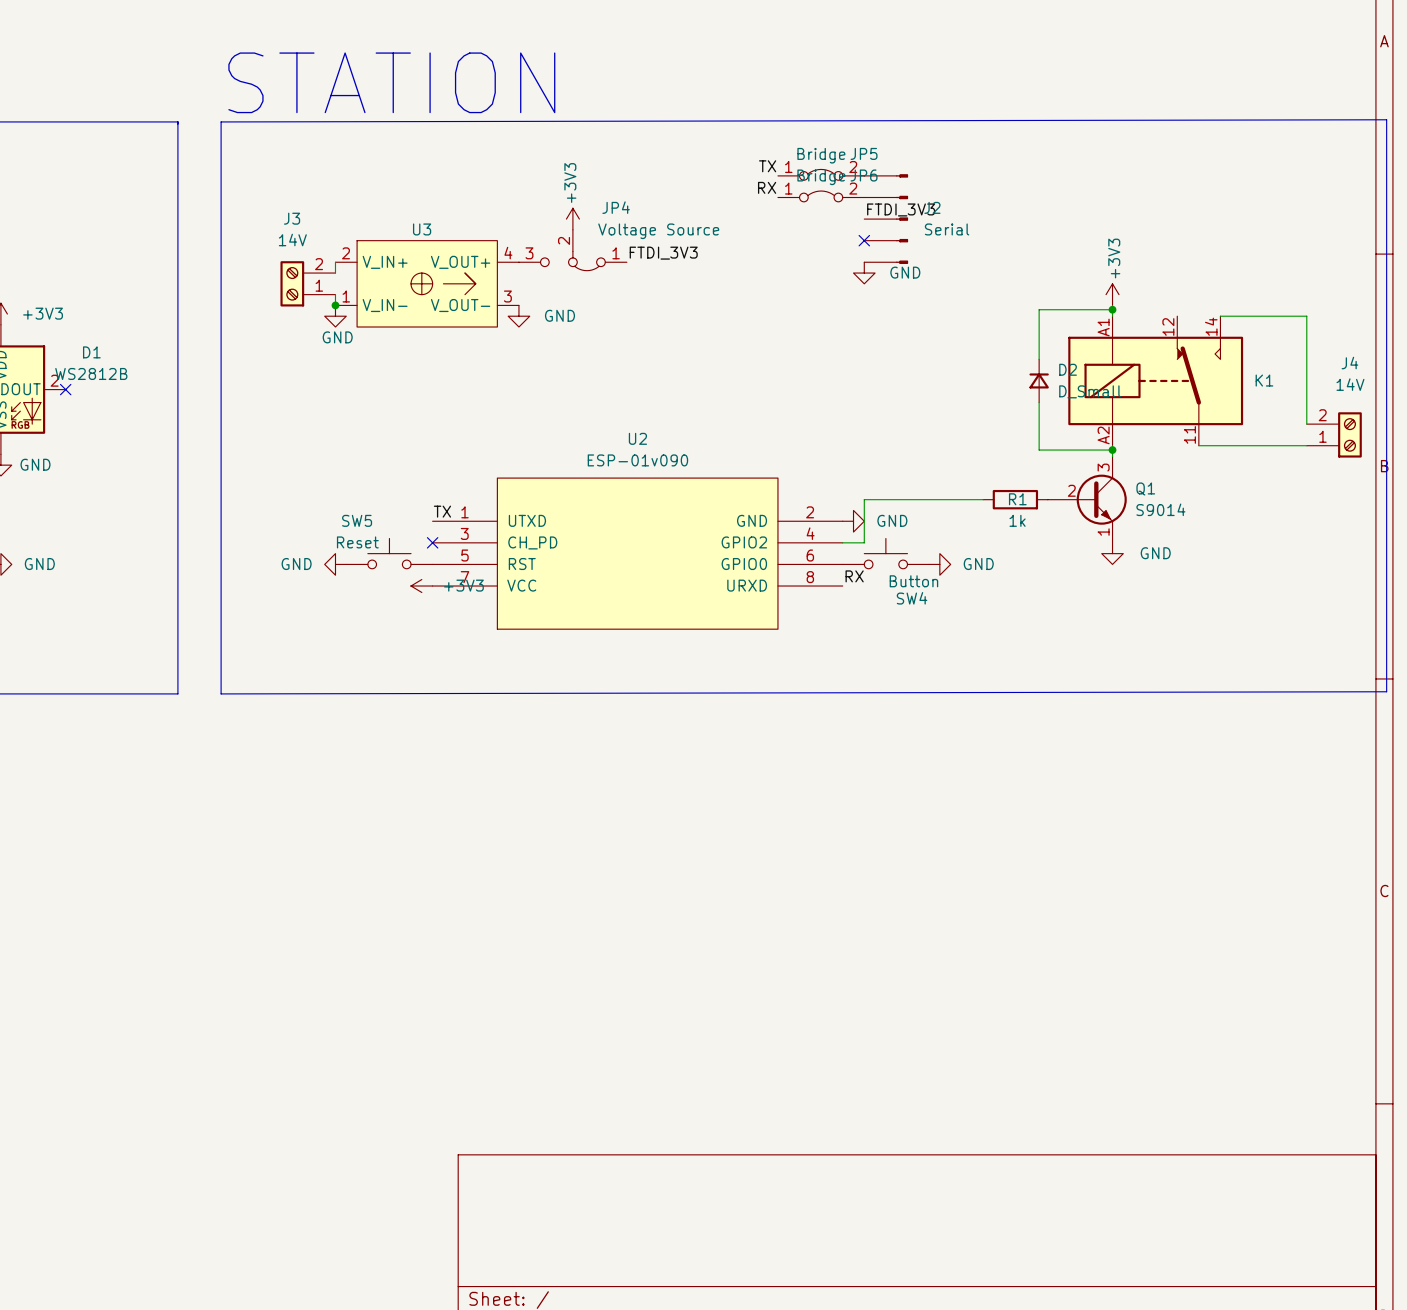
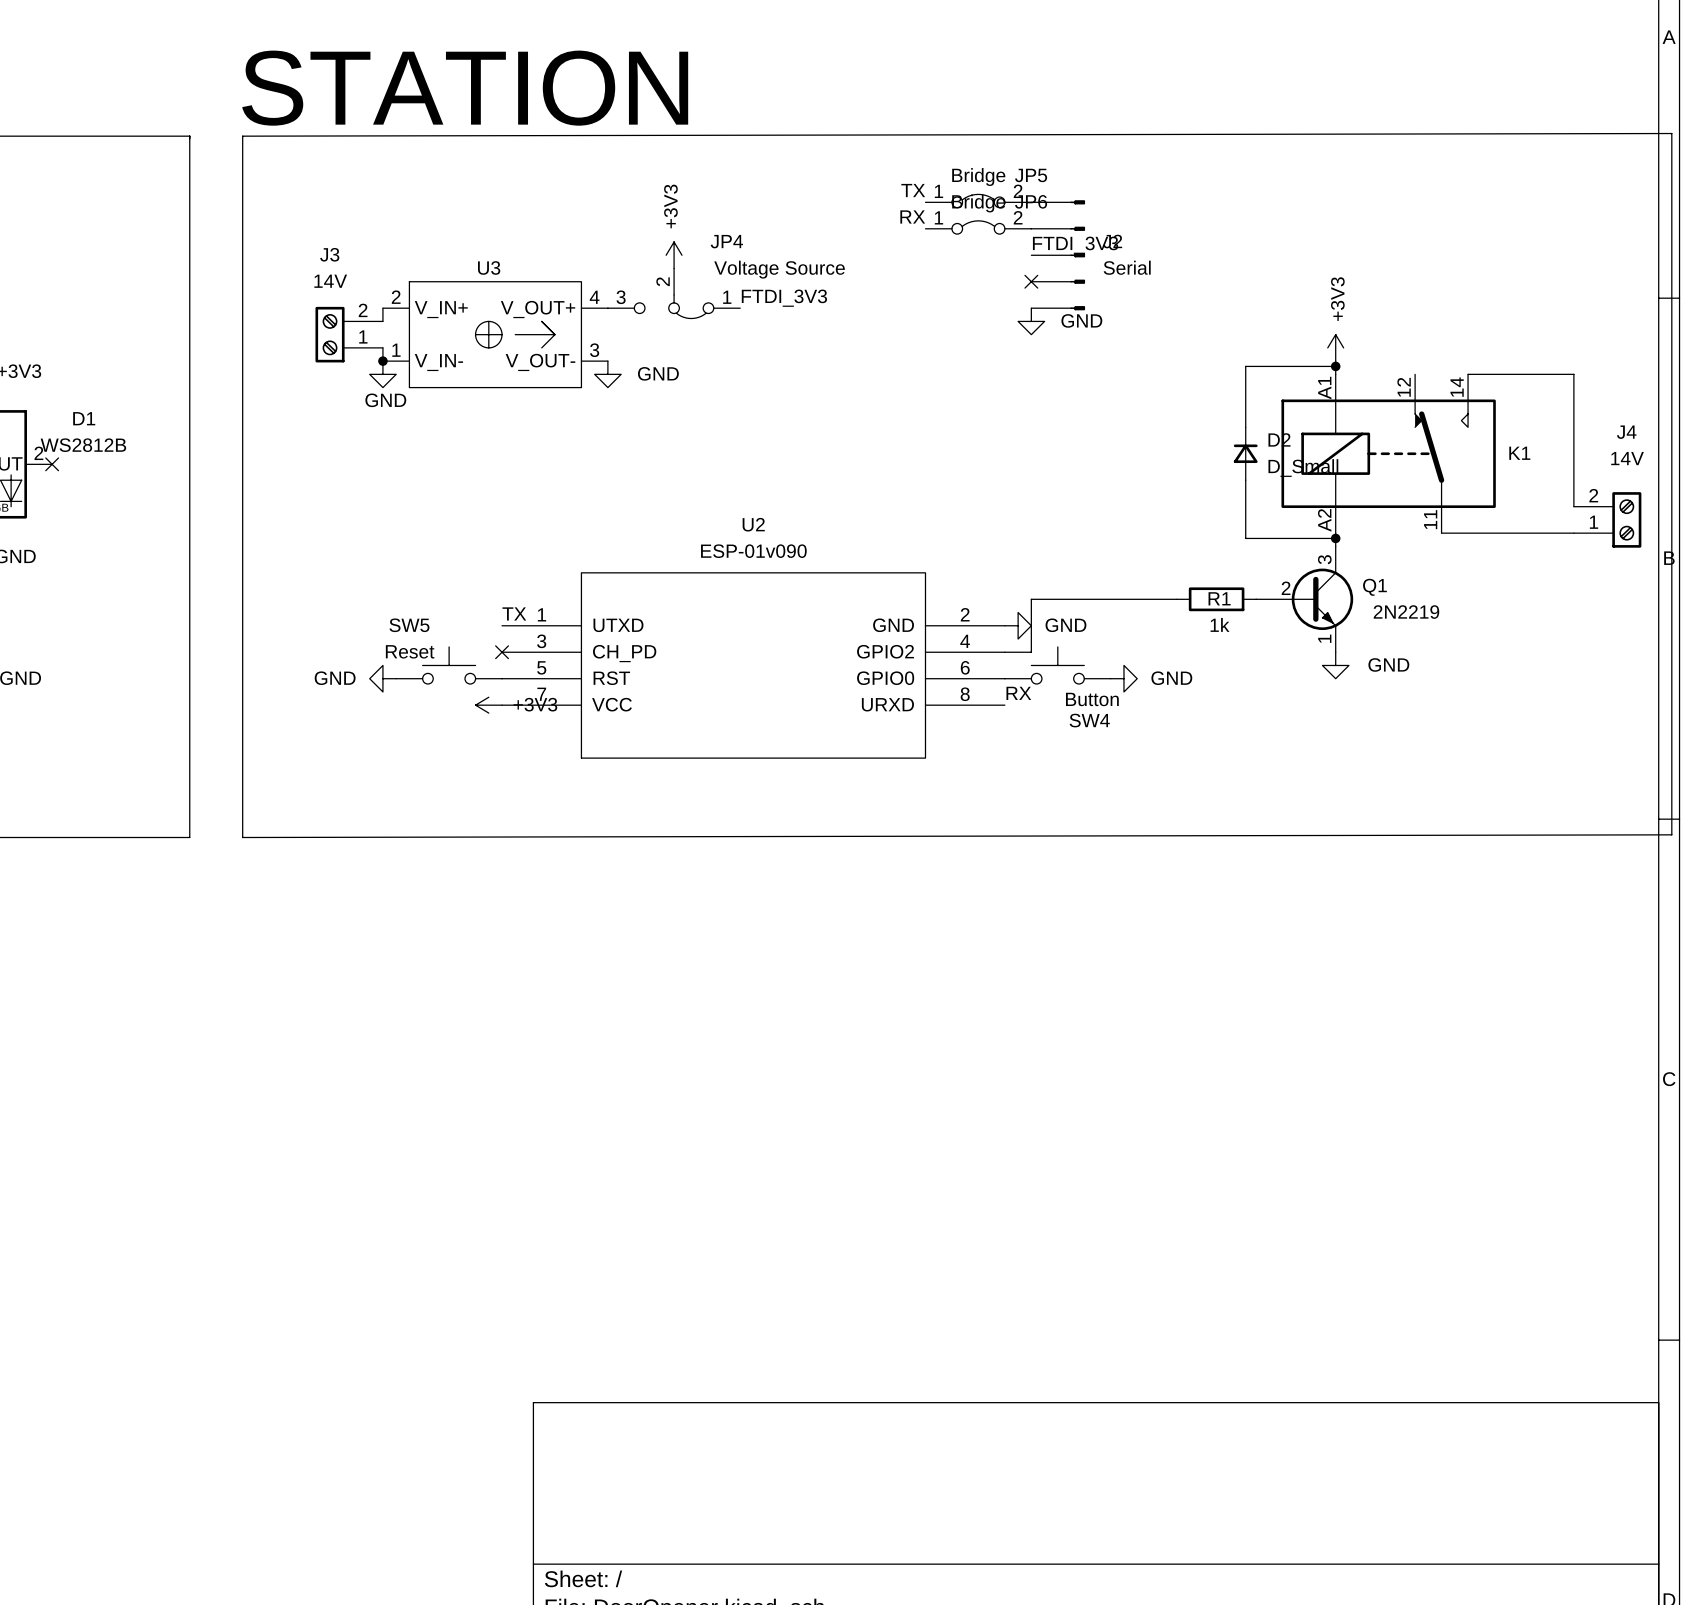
Q1 value: S9014 (1160, 509) -> 2N2219 (1406, 612)

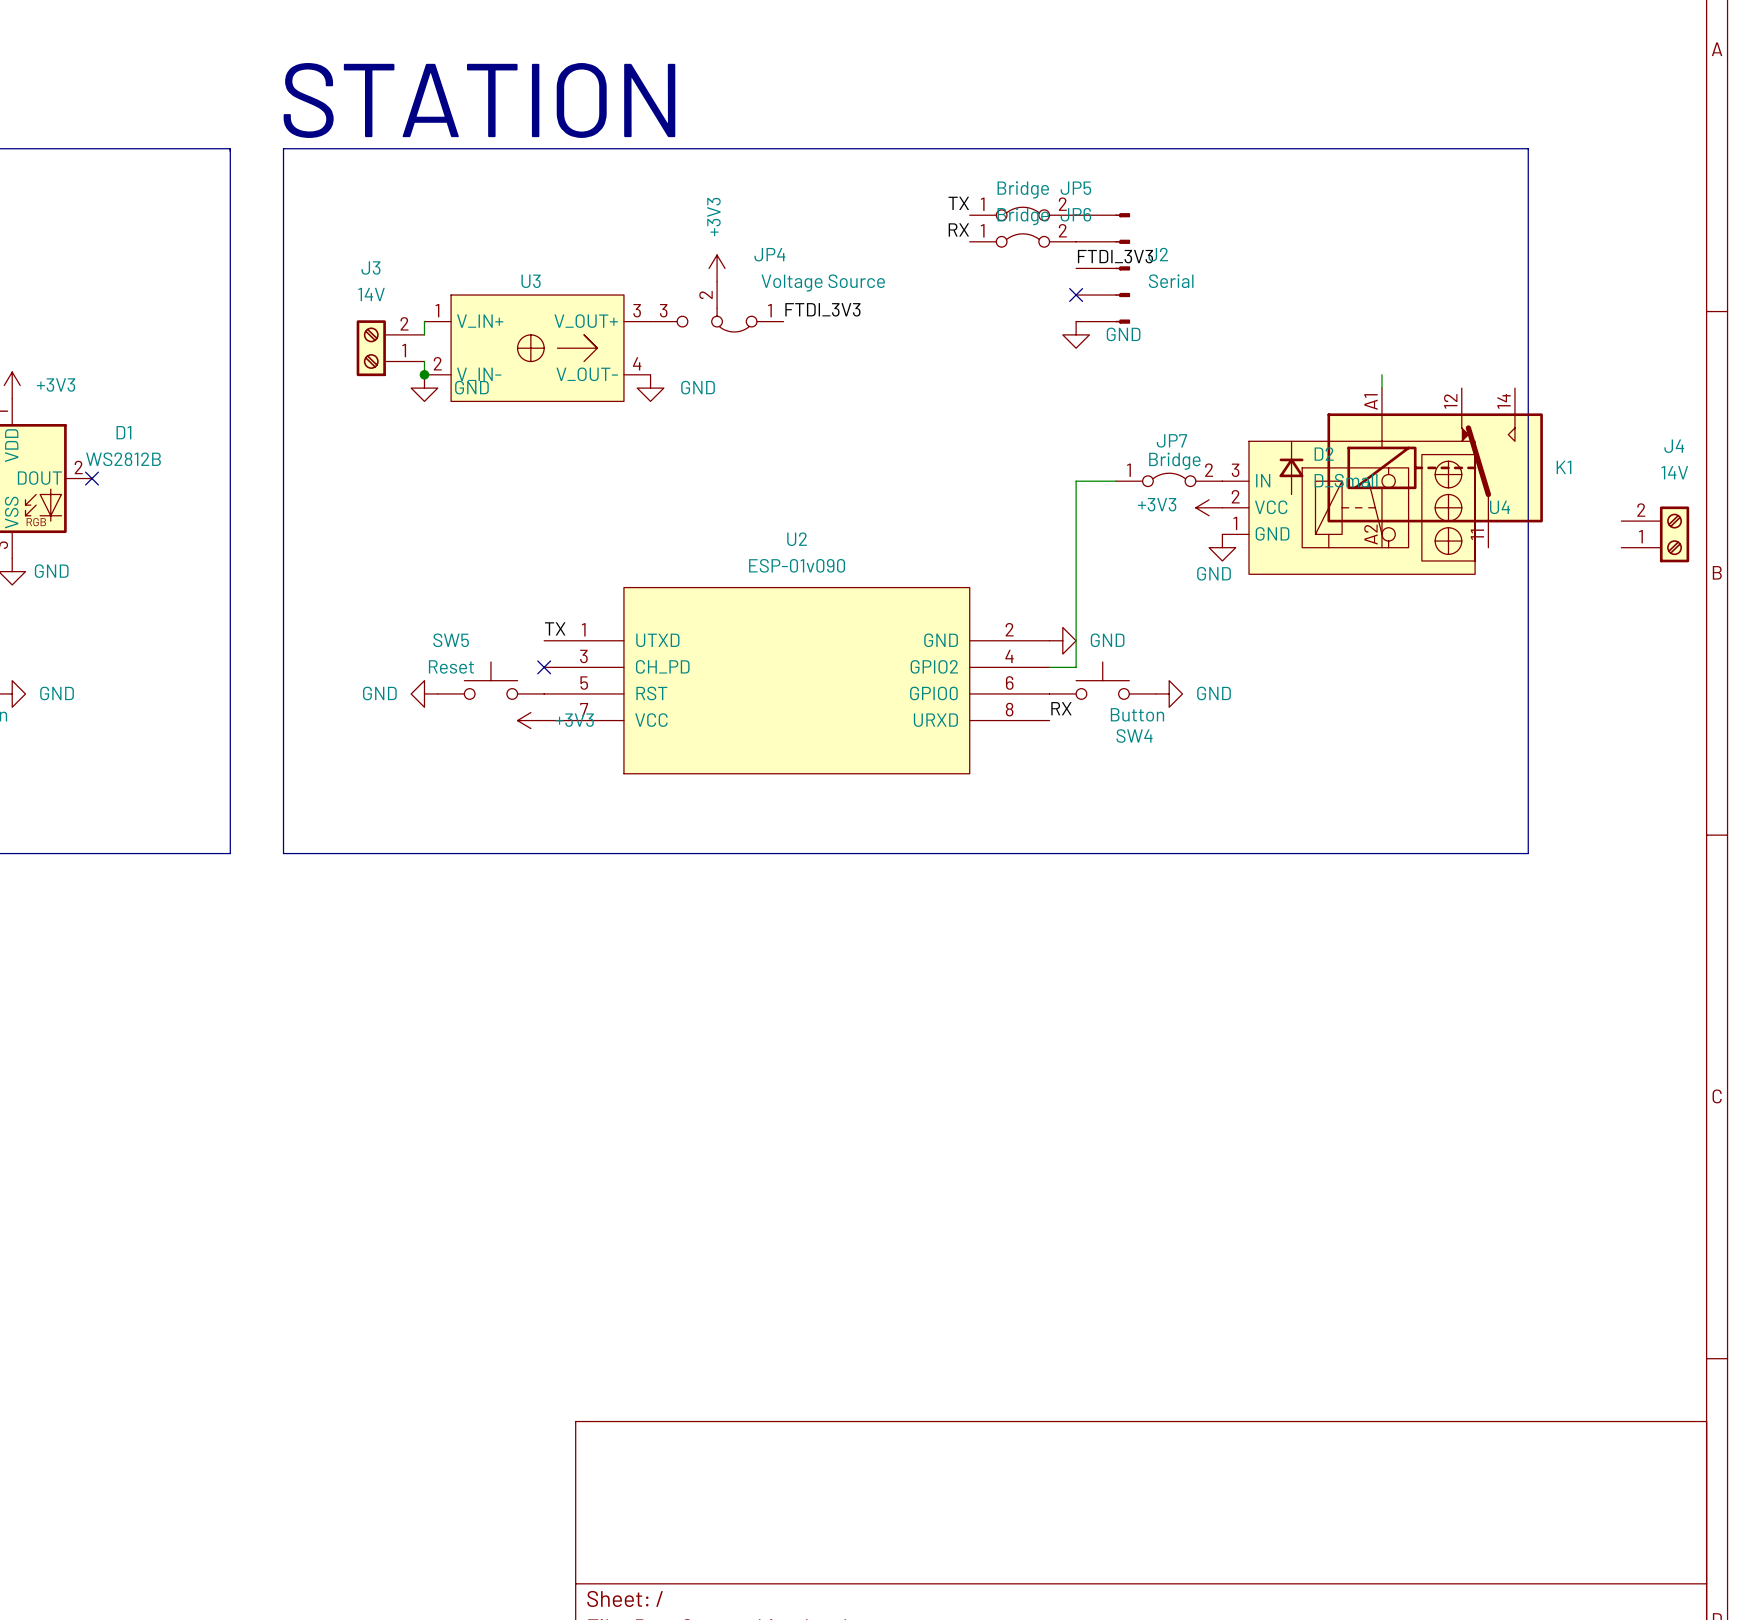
line: (242, 136) (1671, 133) (1671, 834) (242, 837) -> (283, 148) (1528, 148) (1528, 853) (283, 853)
U3 pin number: 2 (396, 297) -> 1 (437, 310)
U3 pin number: 4 (594, 297) -> 3 (637, 310)
power symbol rotation: 0° (1335, 347) -> 90° counterclockwise (1209, 507)
power symbol position: +3V3 (1335, 347) -> +3V3 (1209, 507)
U3 pin number: 1 (396, 350) -> 2 (437, 363)
U3 pin number: 3 (594, 350) -> 4 (637, 363)
wire: (1335, 366) (1245, 366) (1245, 427) -> none
junction: (1335, 366) -> none
wire: (1468, 374) (1573, 374) (1573, 506) -> none
power symbol text position: GND (385, 400) -> GND (471, 387)
JP7: none -> Bridge (1169, 479)
U4: none -> (1348, 507)
wire: (1441, 533) (1573, 533) -> none
junction: (1335, 538) -> none
wire: (1031, 599) (1176, 599) -> (1076, 614) (1076, 481) (1116, 481)
R1: 1k (1216, 599) -> none
Q1: 2N2219 (1304, 599) -> none
power symbol text position: GND (1388, 664) -> GND (1214, 573)
power symbol position: GND (1335, 665) -> GND (1222, 547)

